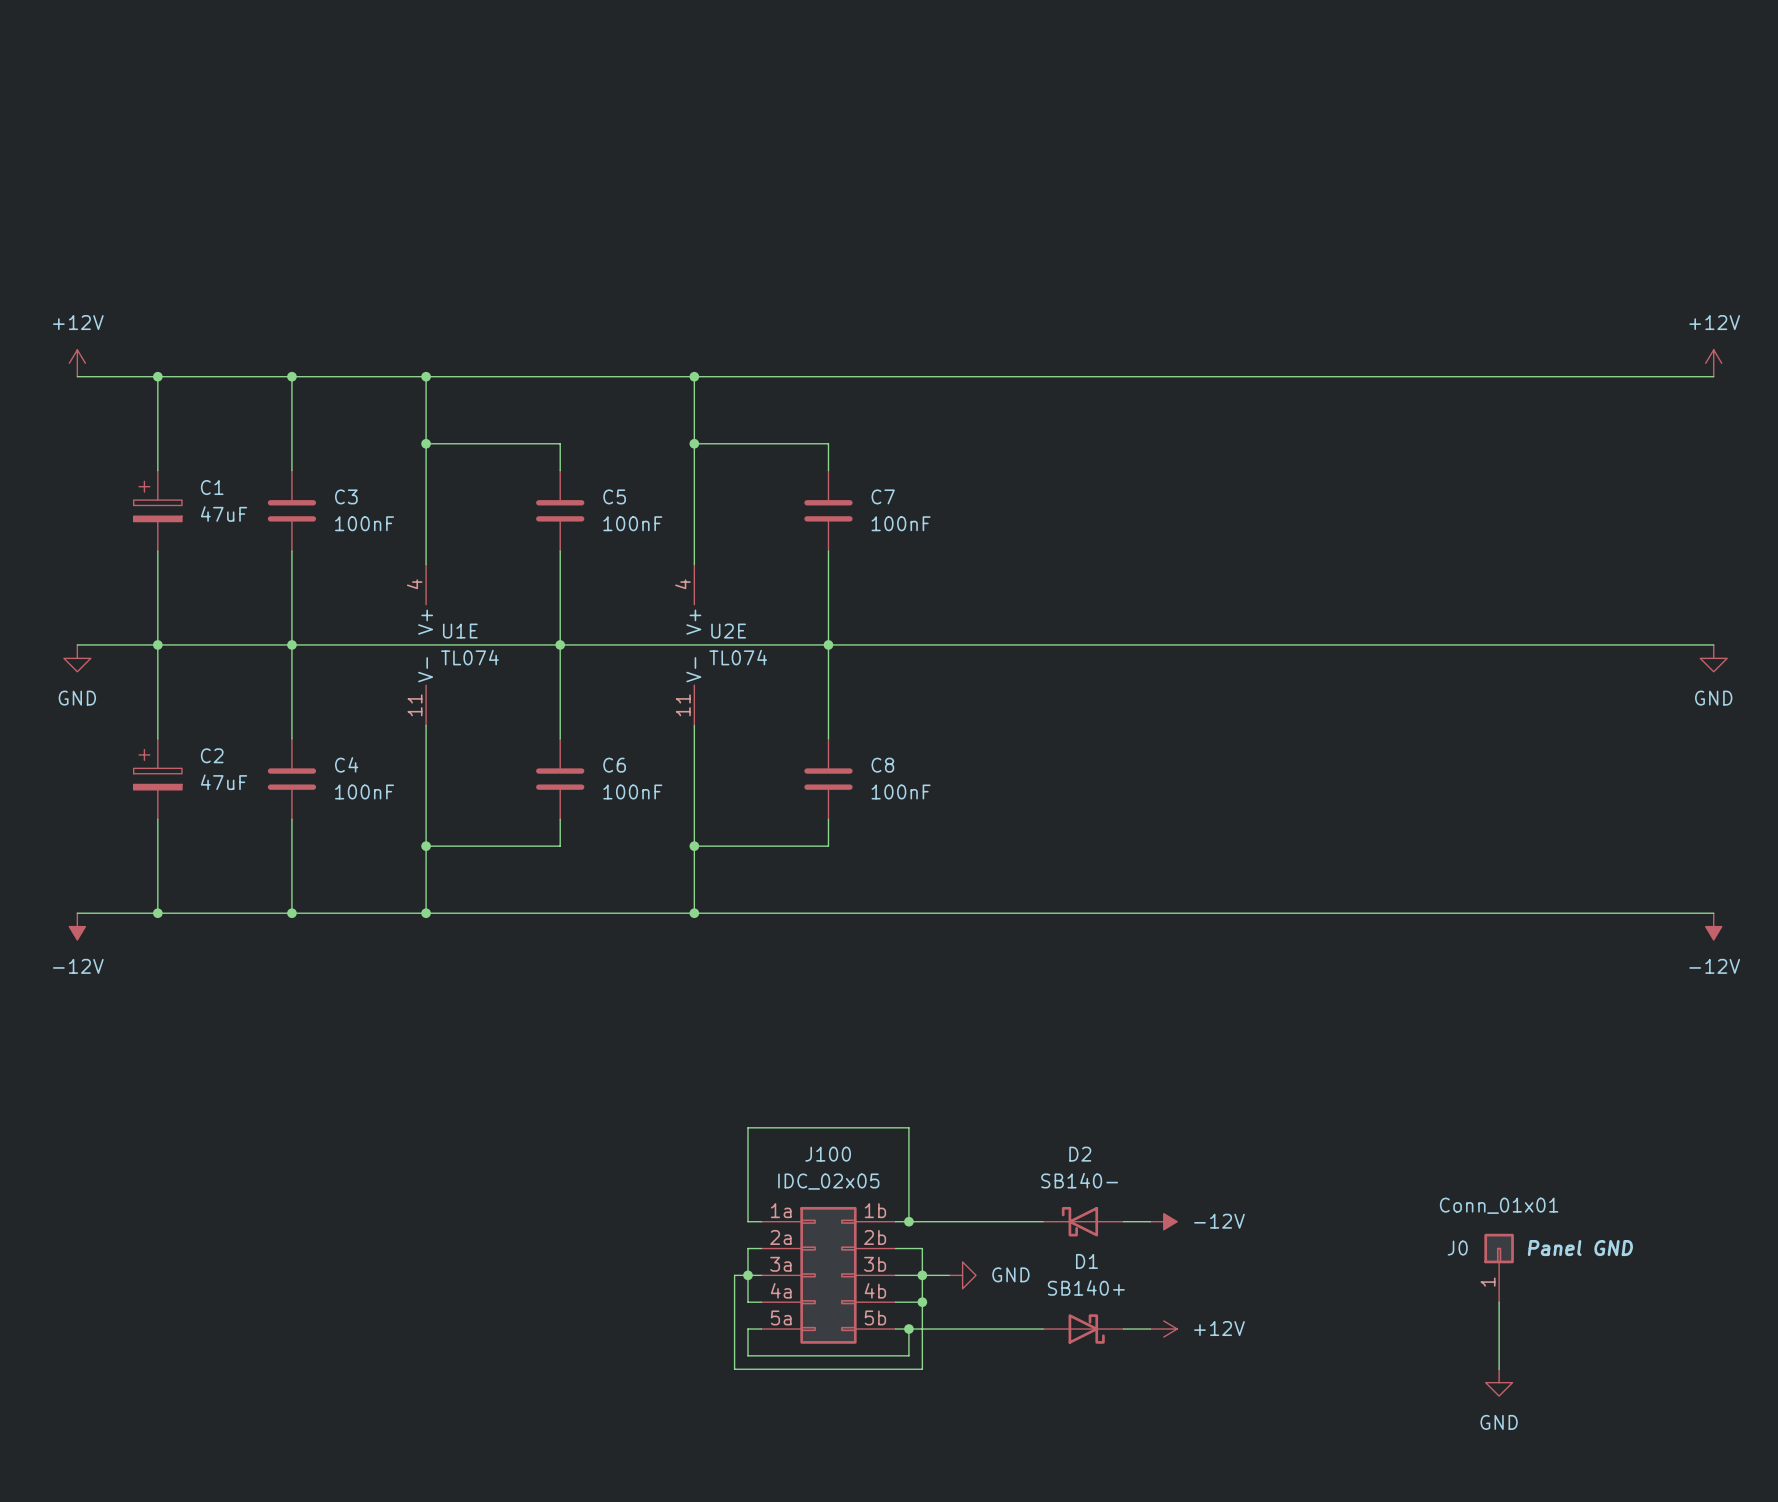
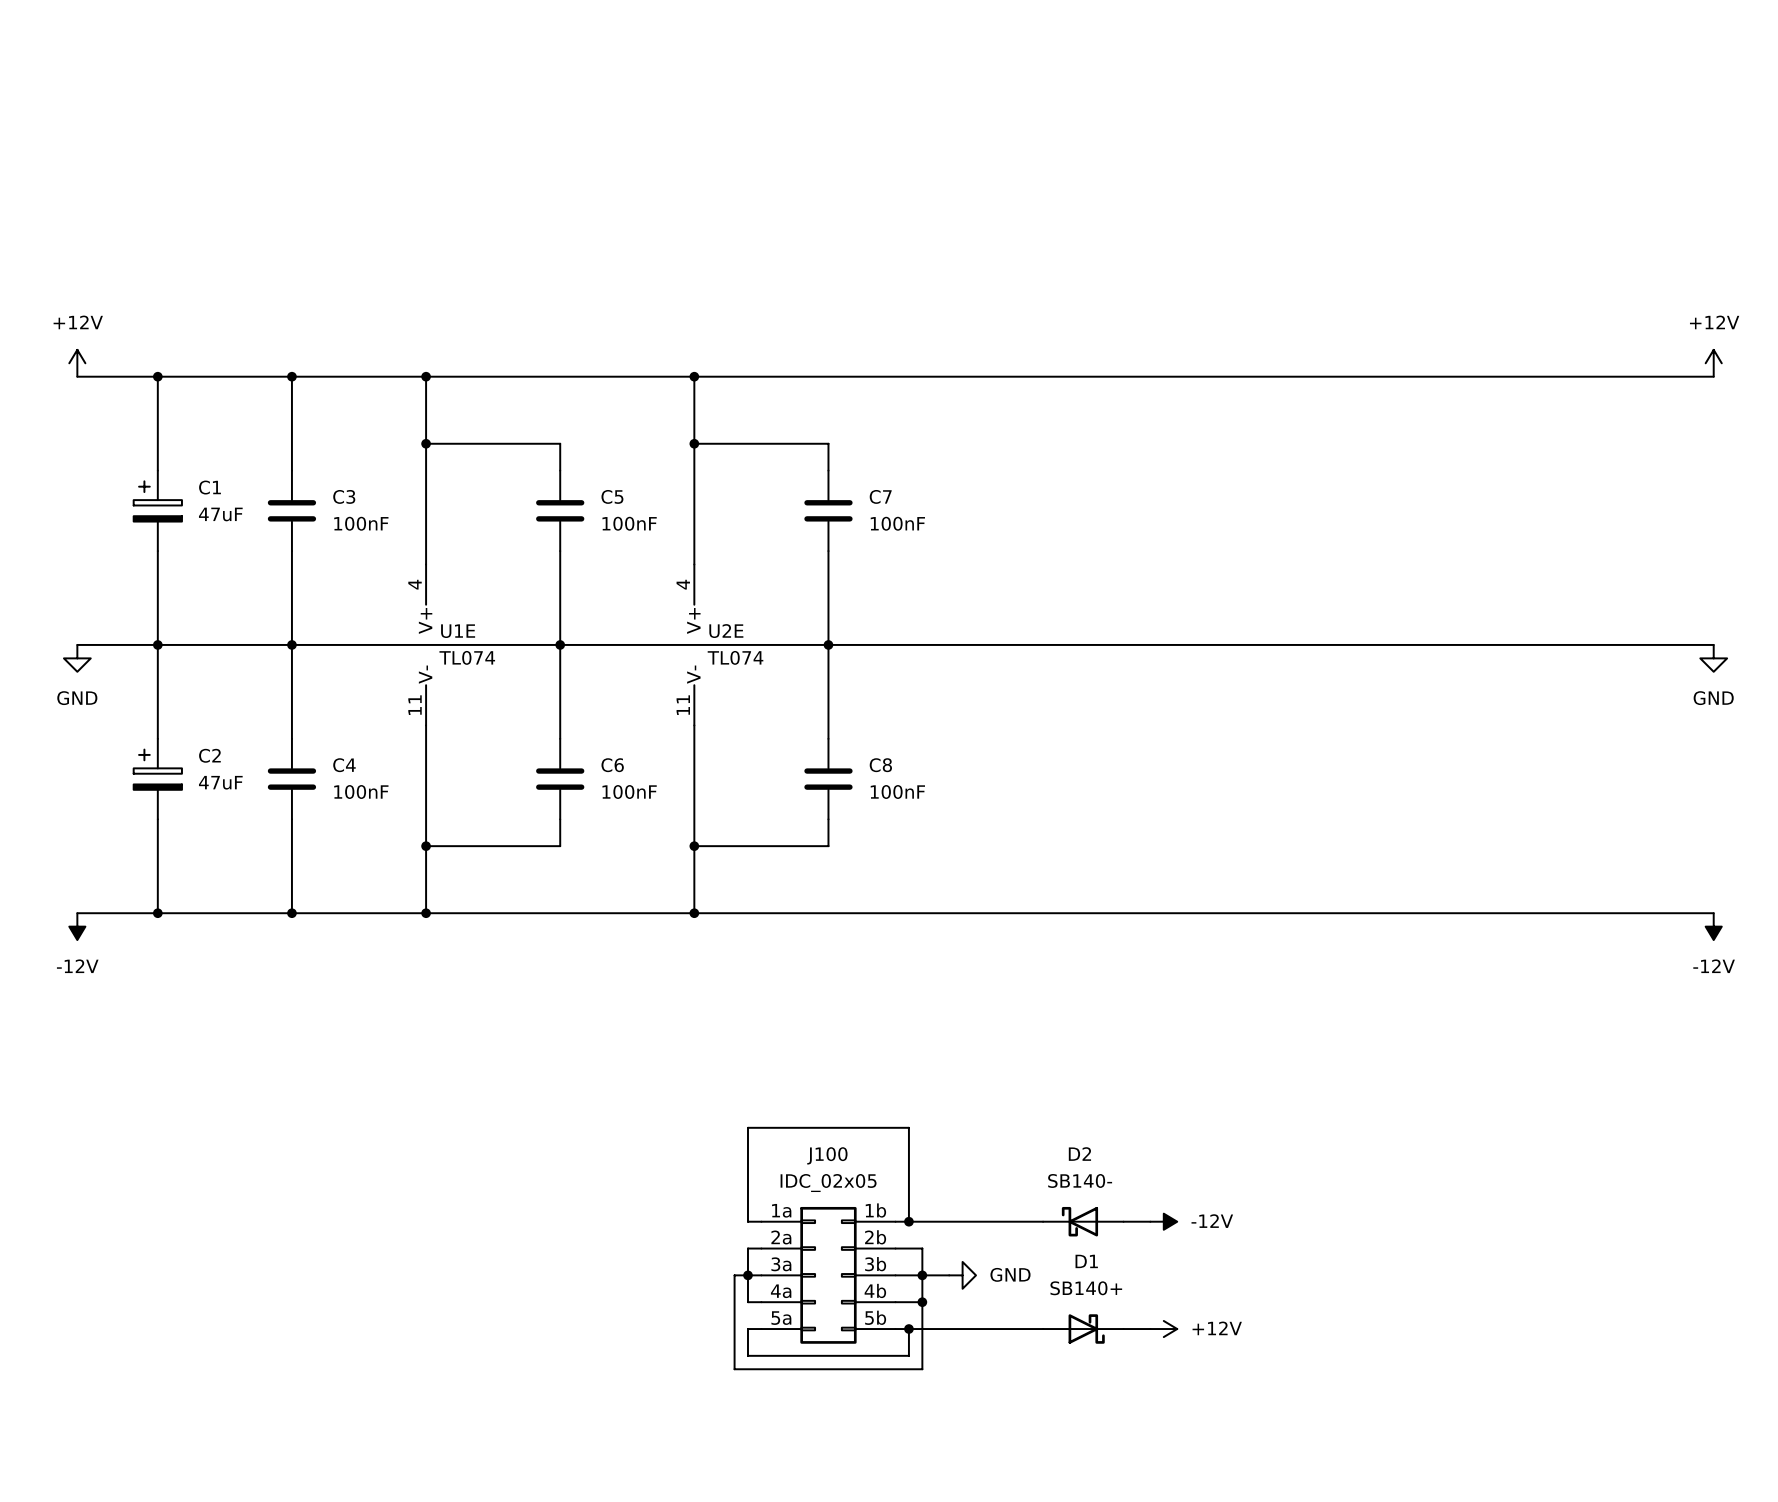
J0: Conn_01x01 (1499, 1267) -> none
wire: (1499, 1302) (1499, 1369) -> none
power symbol: GND (1499, 1382) -> none

